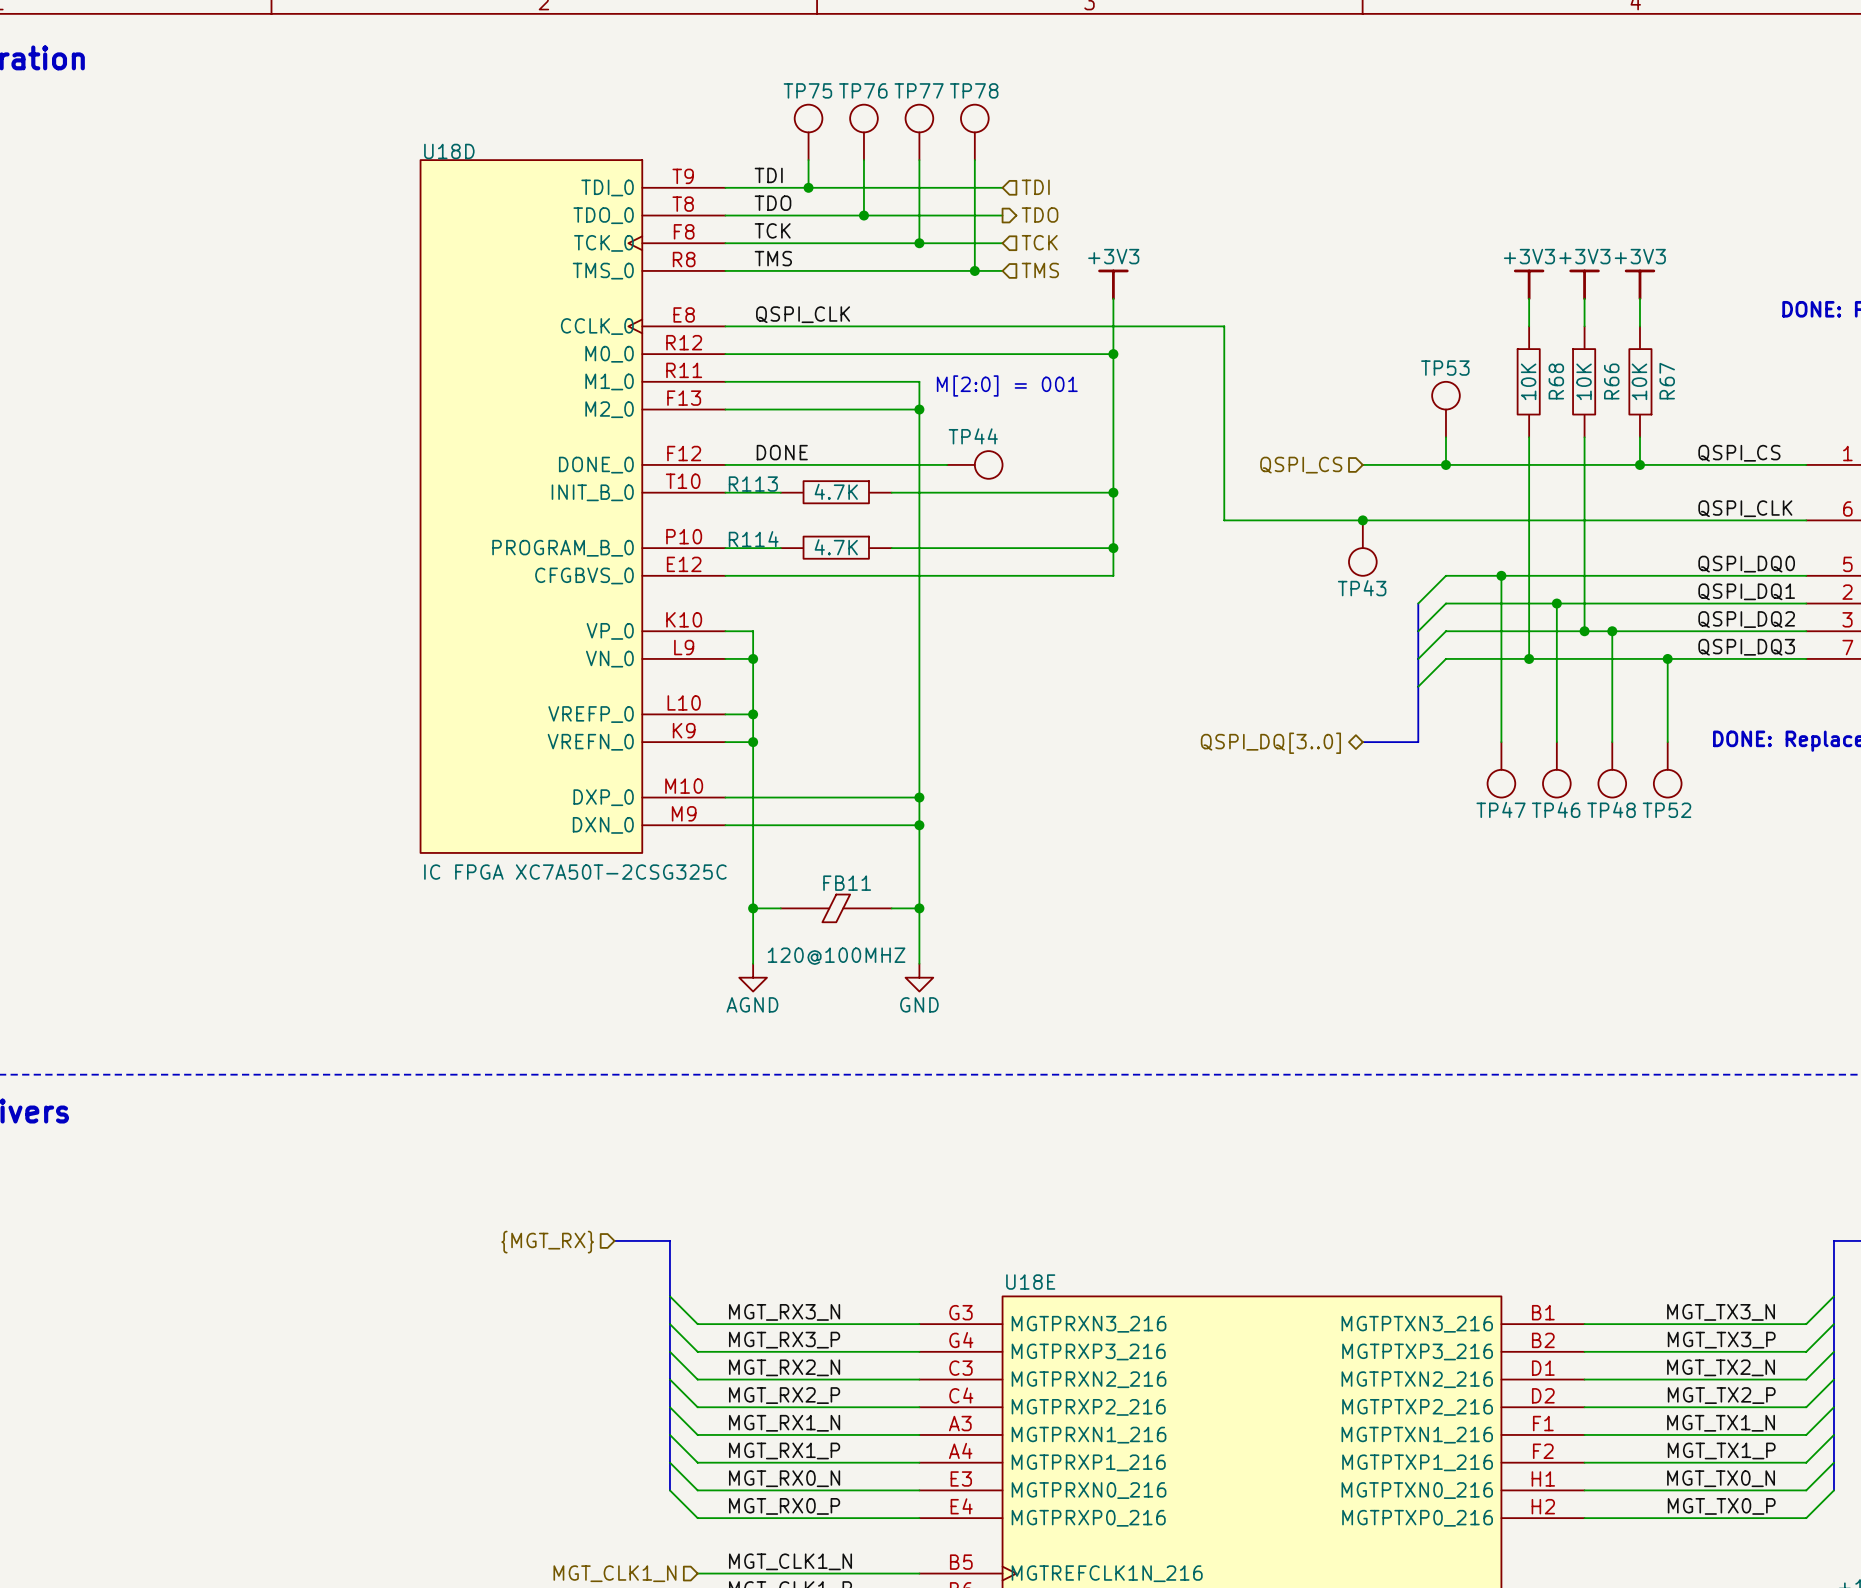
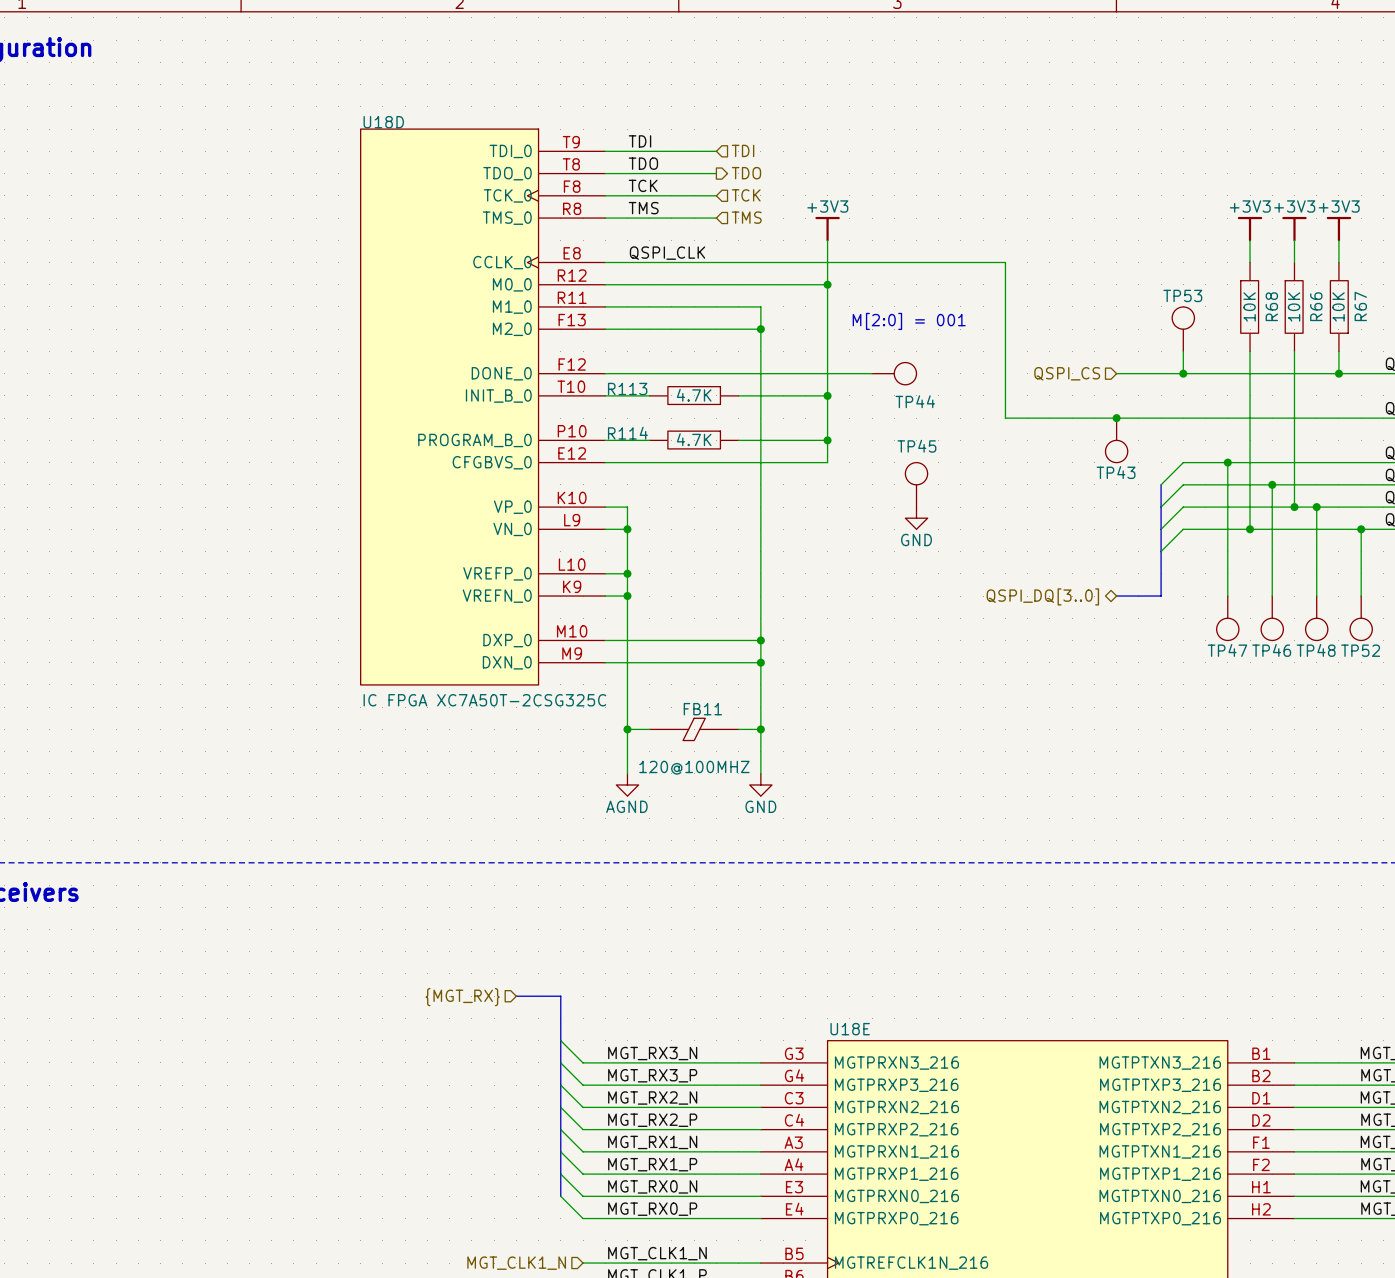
TP75: (808, 132) -> none
TP76: (863, 132) -> none
TP77: (919, 132) -> none
TP78: (974, 132) -> none
wire: (808, 160) (808, 187) -> none
wire: (863, 160) (863, 215) (1002, 215) -> none
wire: (919, 160) (919, 243) -> none
wire: (974, 160) (974, 270) -> none
junction: (808, 187) -> none
wire: (863, 187) (1002, 187) -> none
hierarchical label position: TDI (1035, 187) -> TDI (743, 150)
junction: (863, 215) -> none
hierarchical label position: TDO (1040, 215) -> TDO (746, 173)
hierarchical label position: TCK (1039, 242) -> TCK (746, 195)
wire: (863, 243) (1002, 243) -> none
junction: (919, 243) -> none
wire: (863, 270) (1002, 270) -> none
junction: (974, 270) -> none
hierarchical label position: TMS (1040, 270) -> TMS (746, 217)
power symbol position: +3V3 (1113, 284) -> +3V3 (827, 229)
wire: (1113, 298) (1113, 575) (1002, 575) -> (827, 240) (827, 462)
wire: (1002, 354) (1113, 354) -> none
junction: none -> (827, 284)
junction: (1113, 354) -> none
text position: M[2:0] = 001 (1007, 385) -> M[2:0] = 001 (909, 321)
TP44 name position: TP44 (973, 436) -> TP44 (915, 401)
label: DONE (782, 452) -> none
TP44 position: (974, 464) -> (894, 373)
wire: (1002, 492) (1113, 492) -> (783, 373) (872, 373)
junction: none -> (827, 395)
junction: (1113, 492) -> none
wire: (1002, 548) (1113, 548) -> none
junction: none -> (827, 440)
junction: (1113, 548) -> none
TP45: none -> (916, 484)
power symbol: none -> GND (916, 518)

